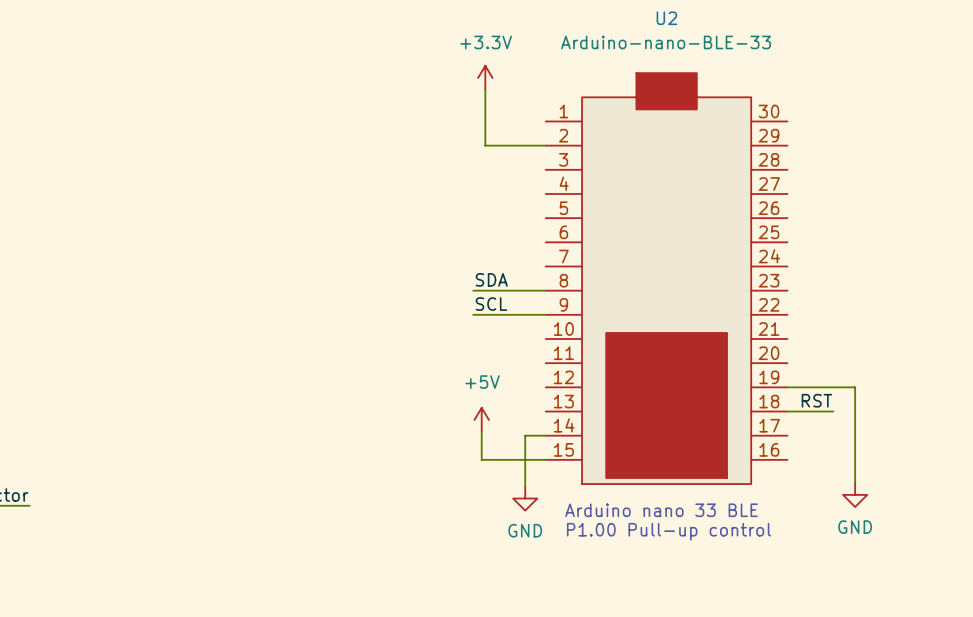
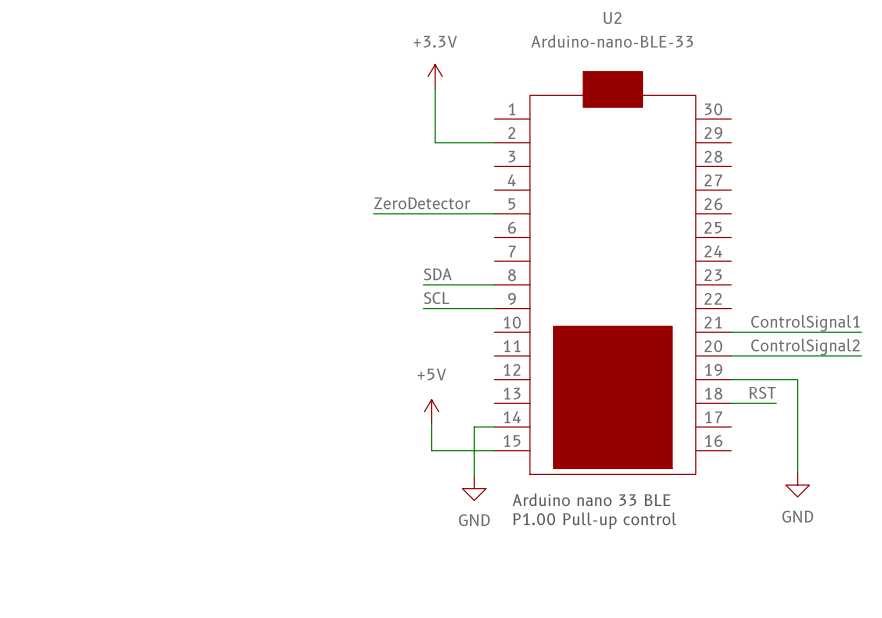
label: none -> ZeroDetector (422, 203)
wire: none -> (373, 213) (494, 213)
label: none -> ControlSignal1 (805, 323)
wire: none -> (731, 332) (861, 332)
label: none -> ControlSignal2 (805, 347)
wire: none -> (731, 355) (861, 355)

